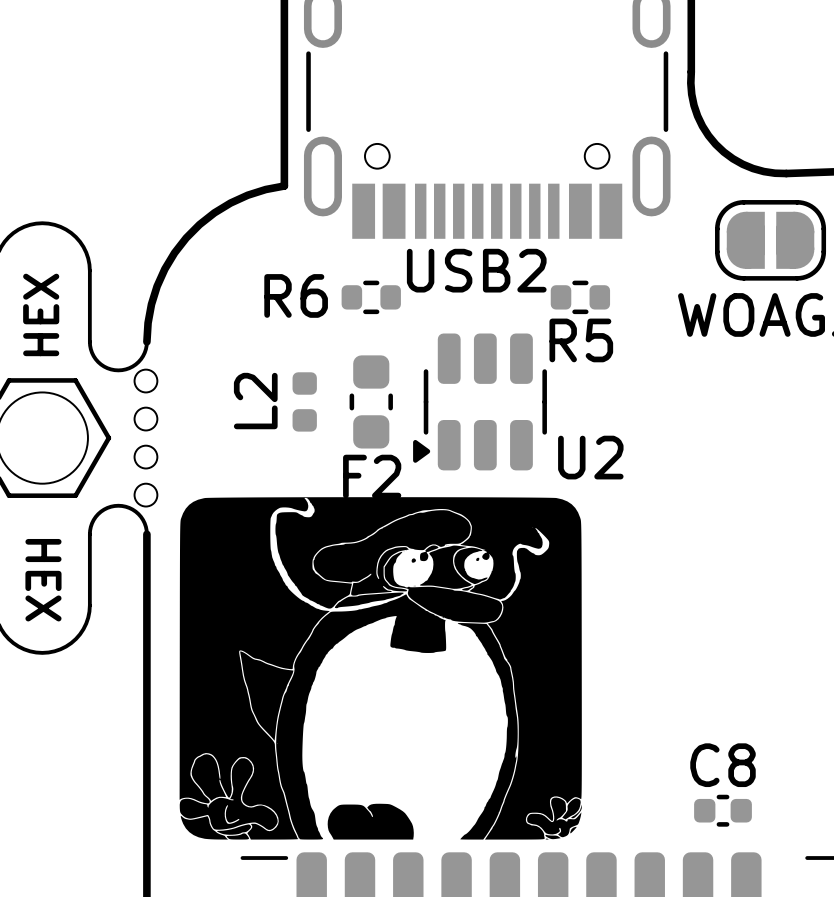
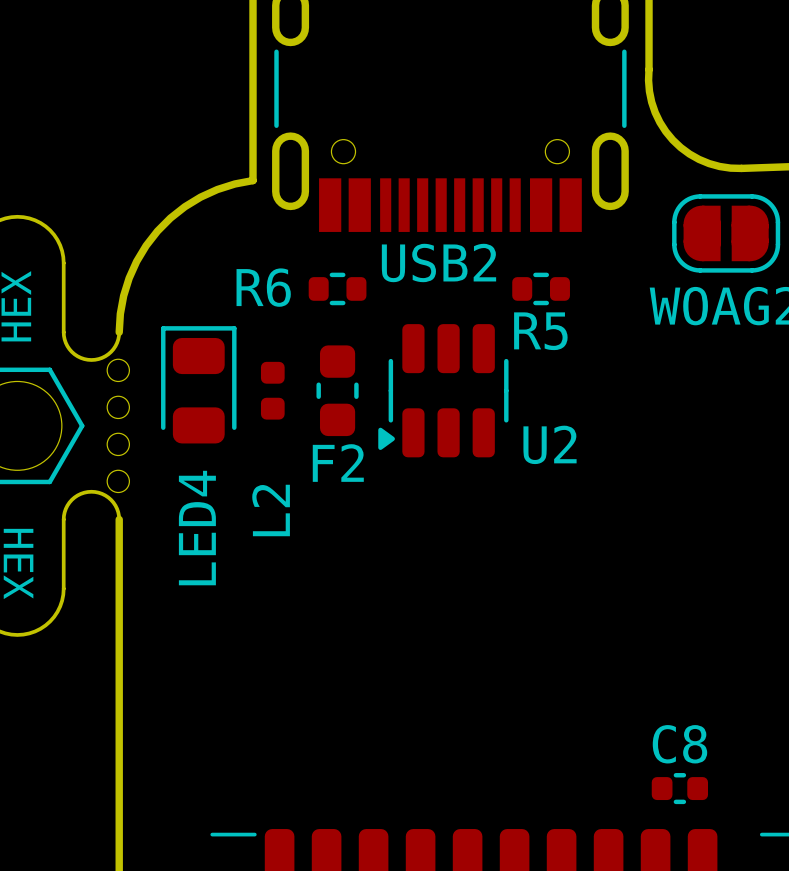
LED4: none -> (198, 384)
L2 name position: L2 (255, 401) -> L2 (271, 510)
drawing: [179, 497, 582, 840] -> none

